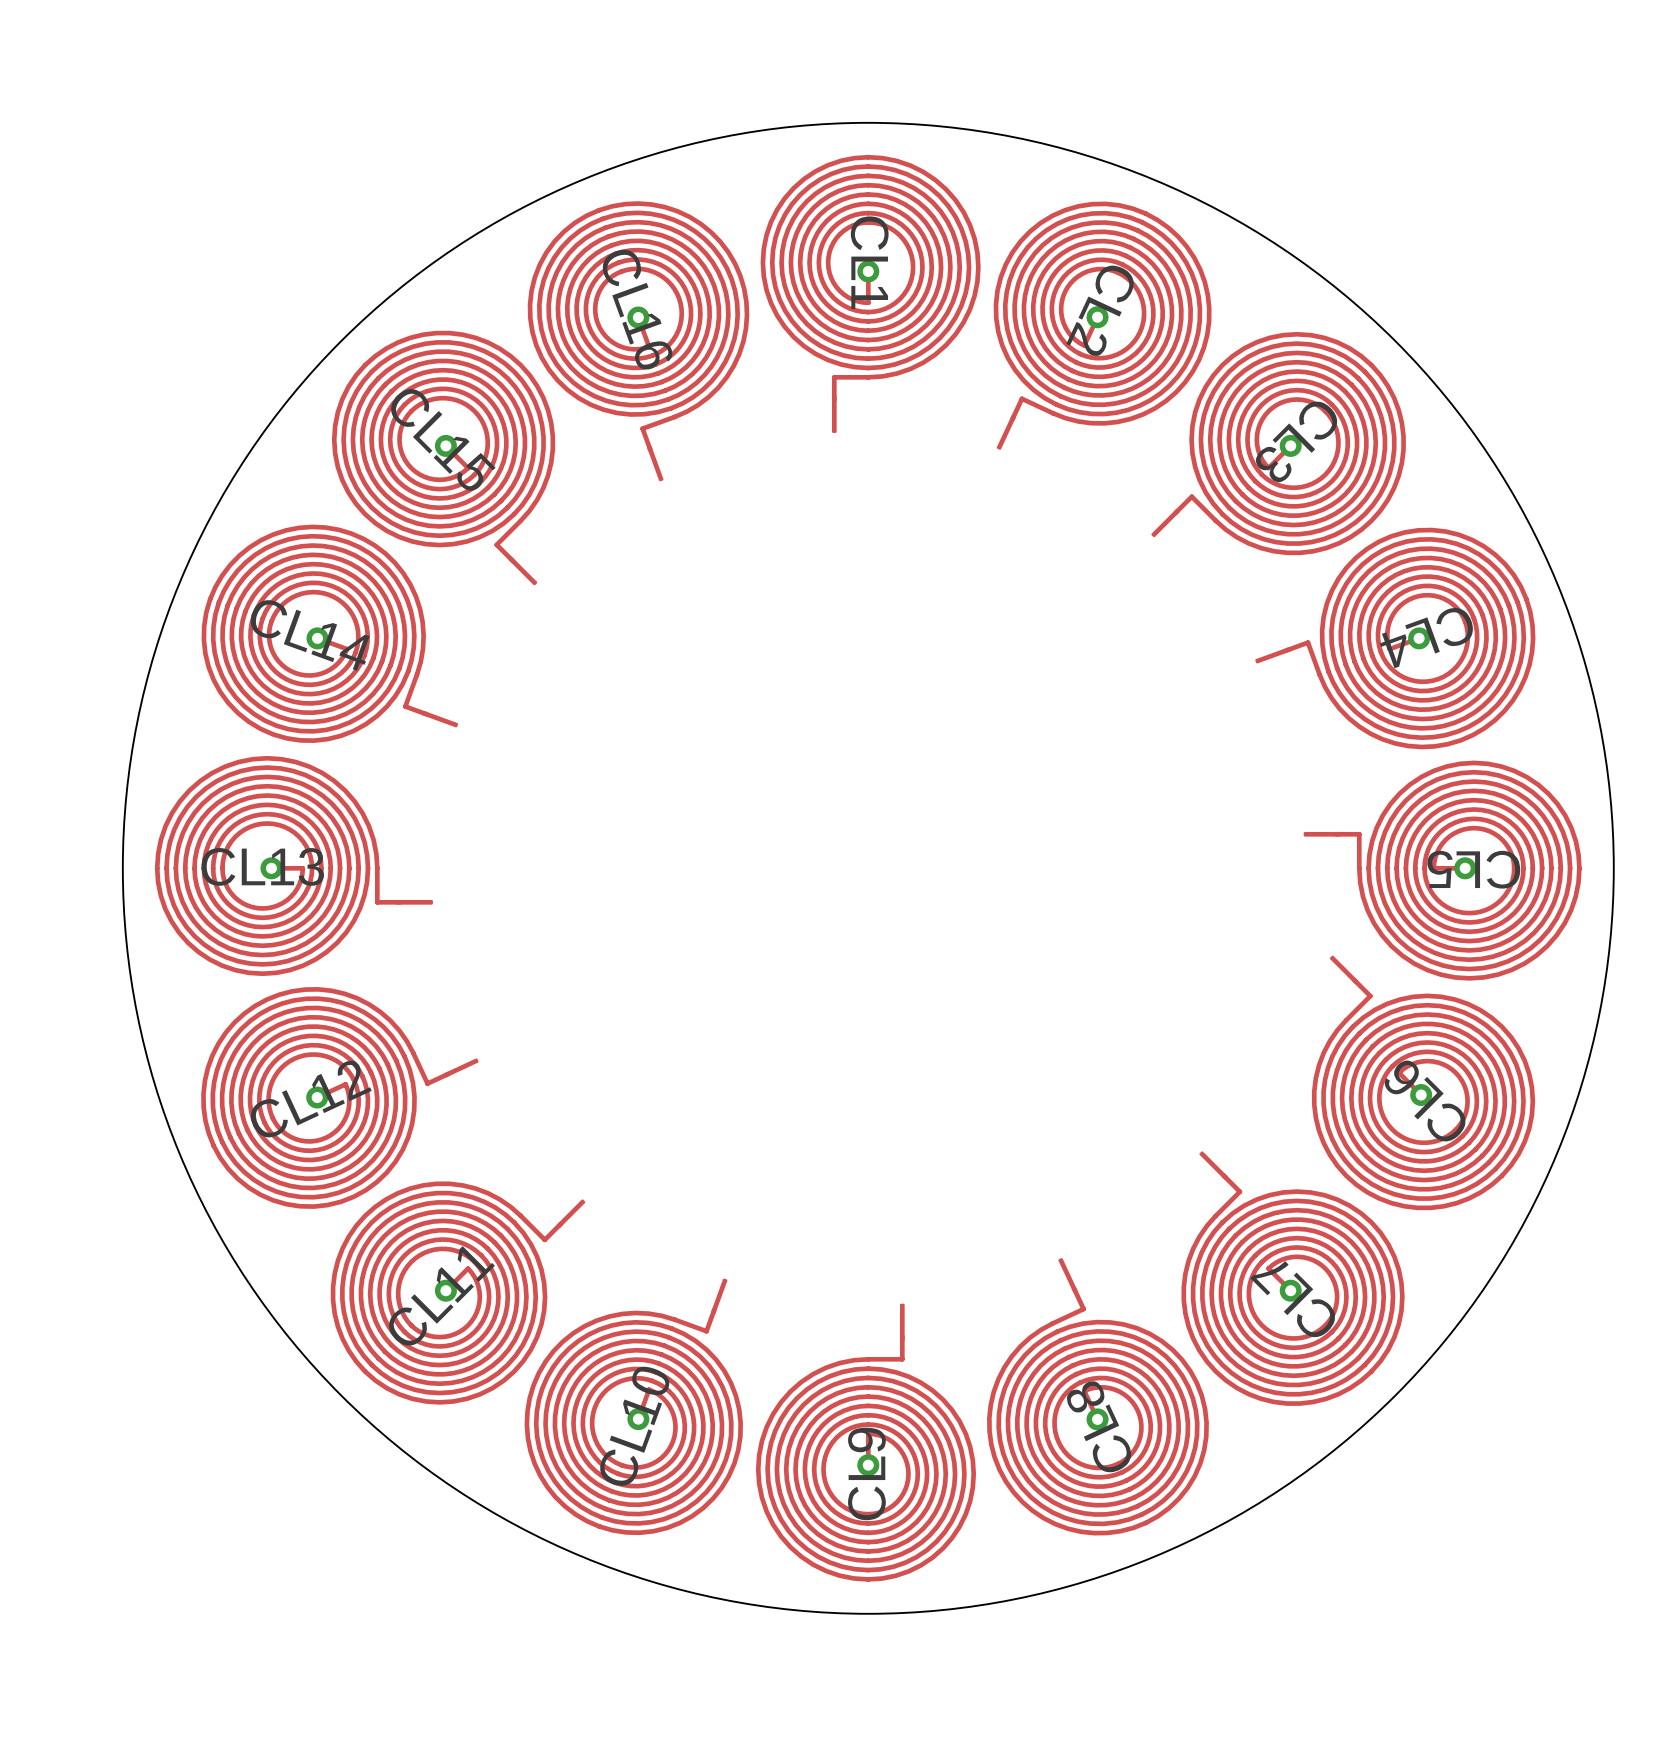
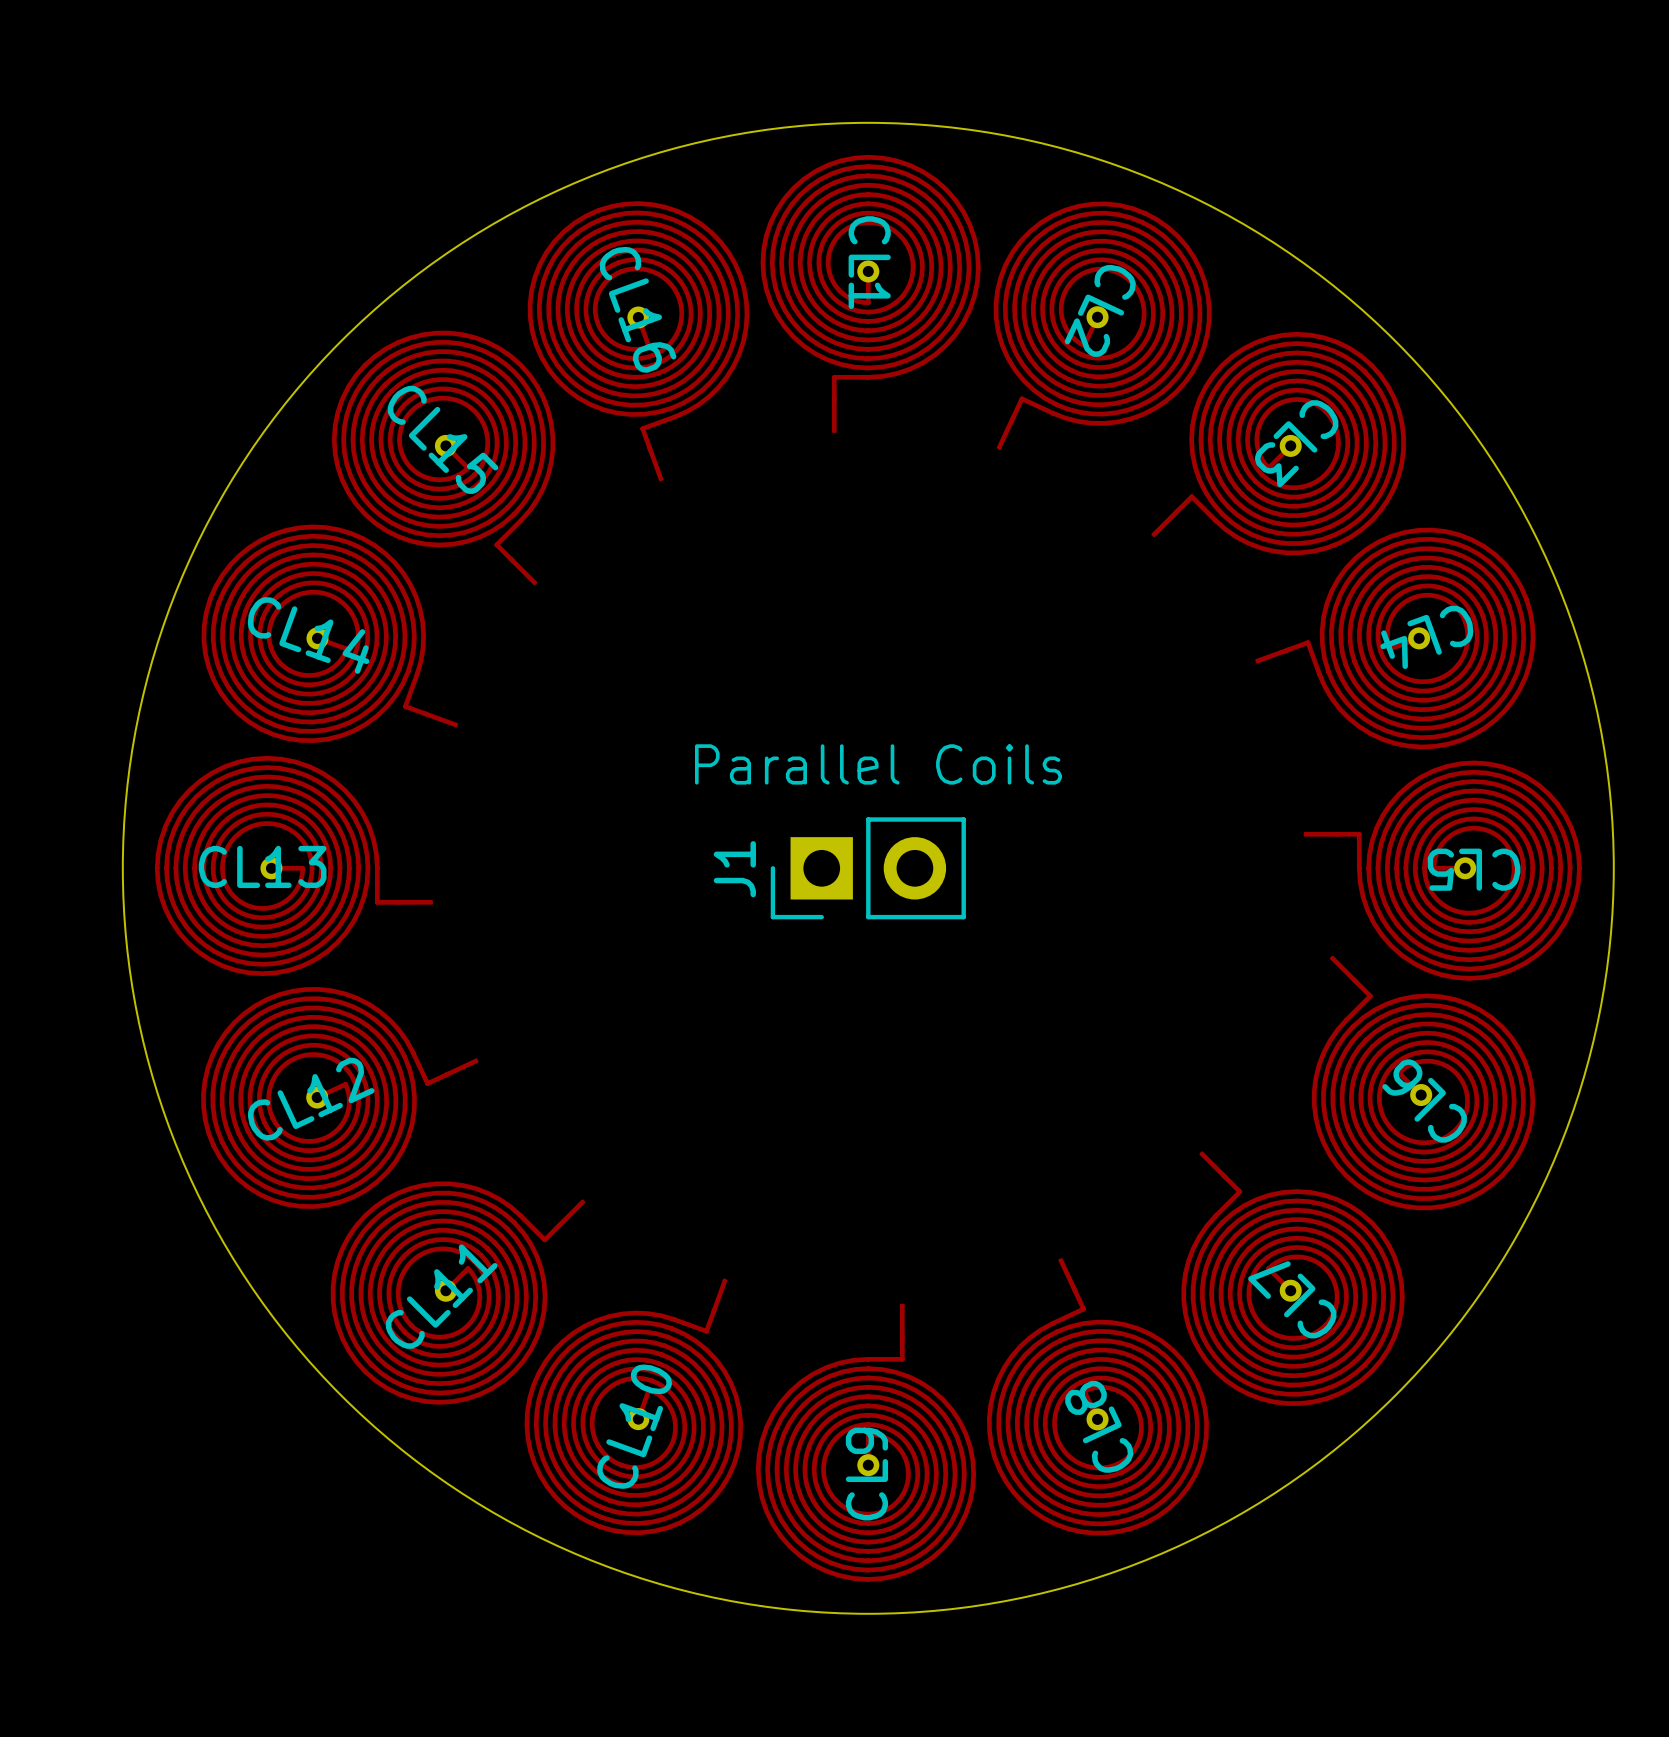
text: none -> Parallel Coils (878, 764)
J1: none -> (868, 868)

